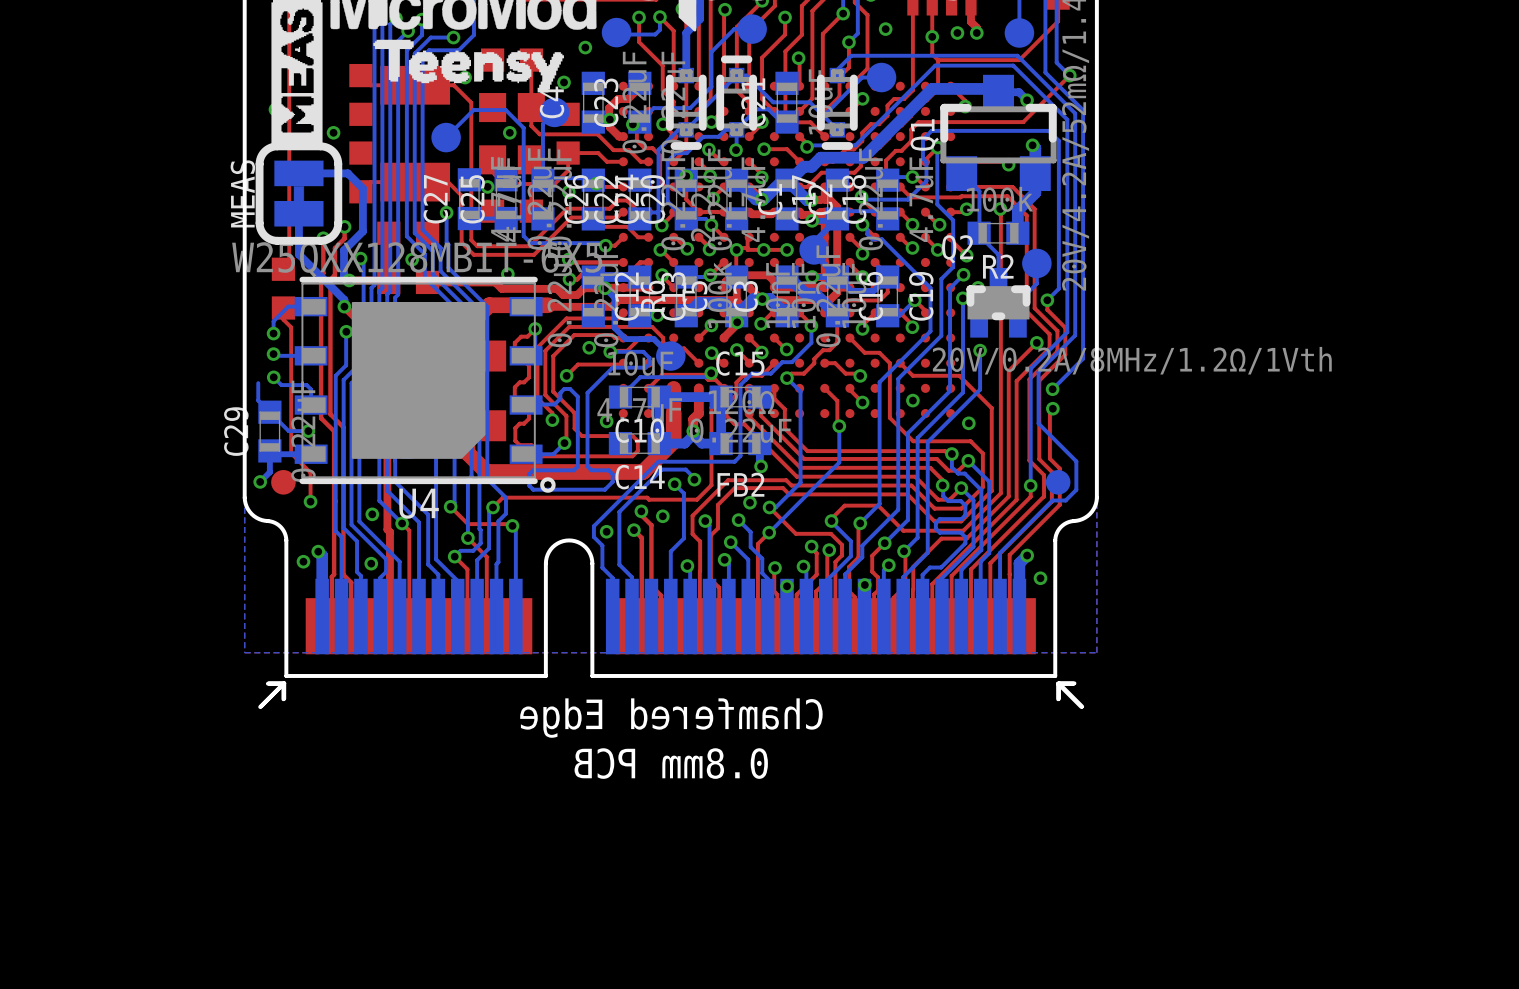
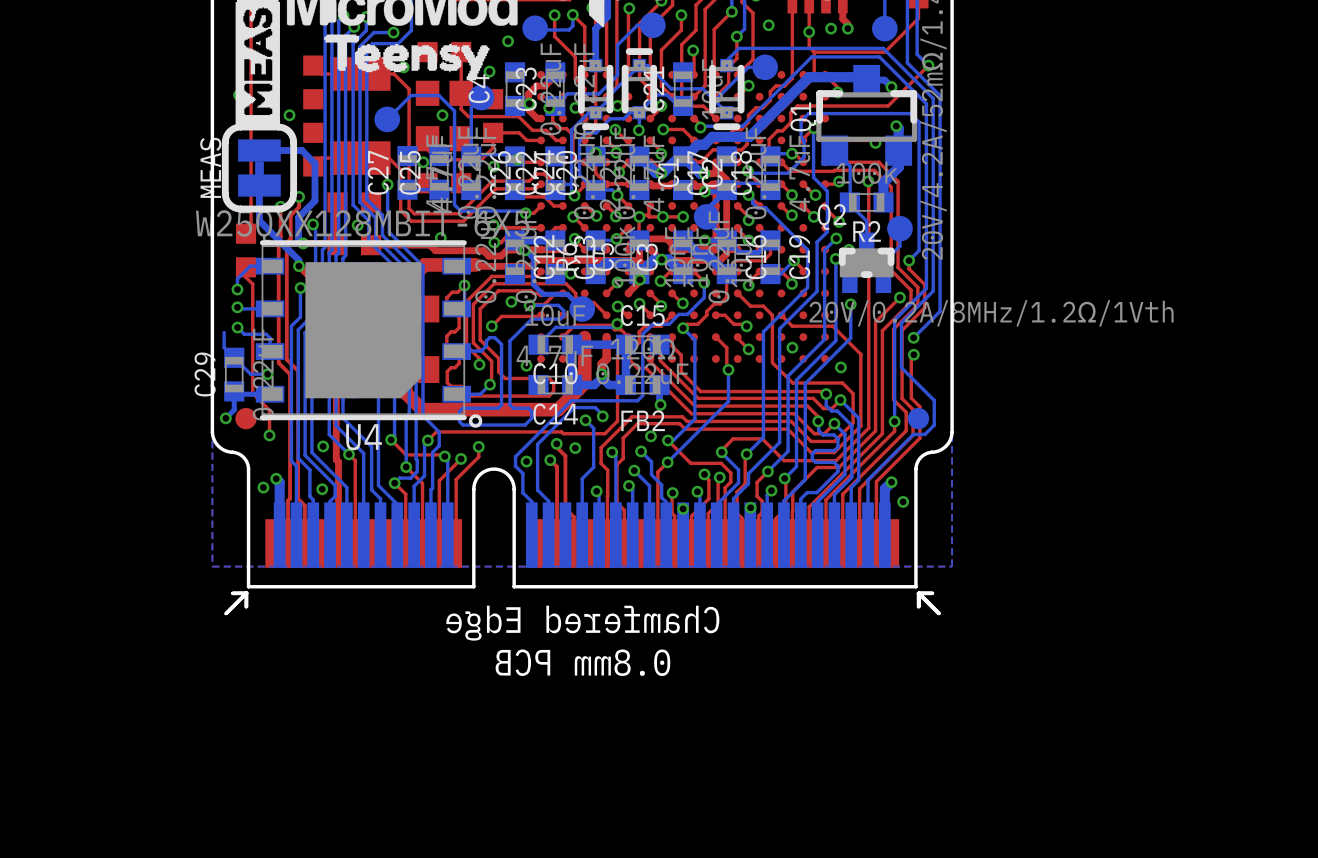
top track: none -> (478, 446) (478, 456) (456, 479) (456, 543)
via: none -> (478, 446)
top track: none -> (461, 459) (439, 480) (439, 543)
via: none -> (461, 458)

